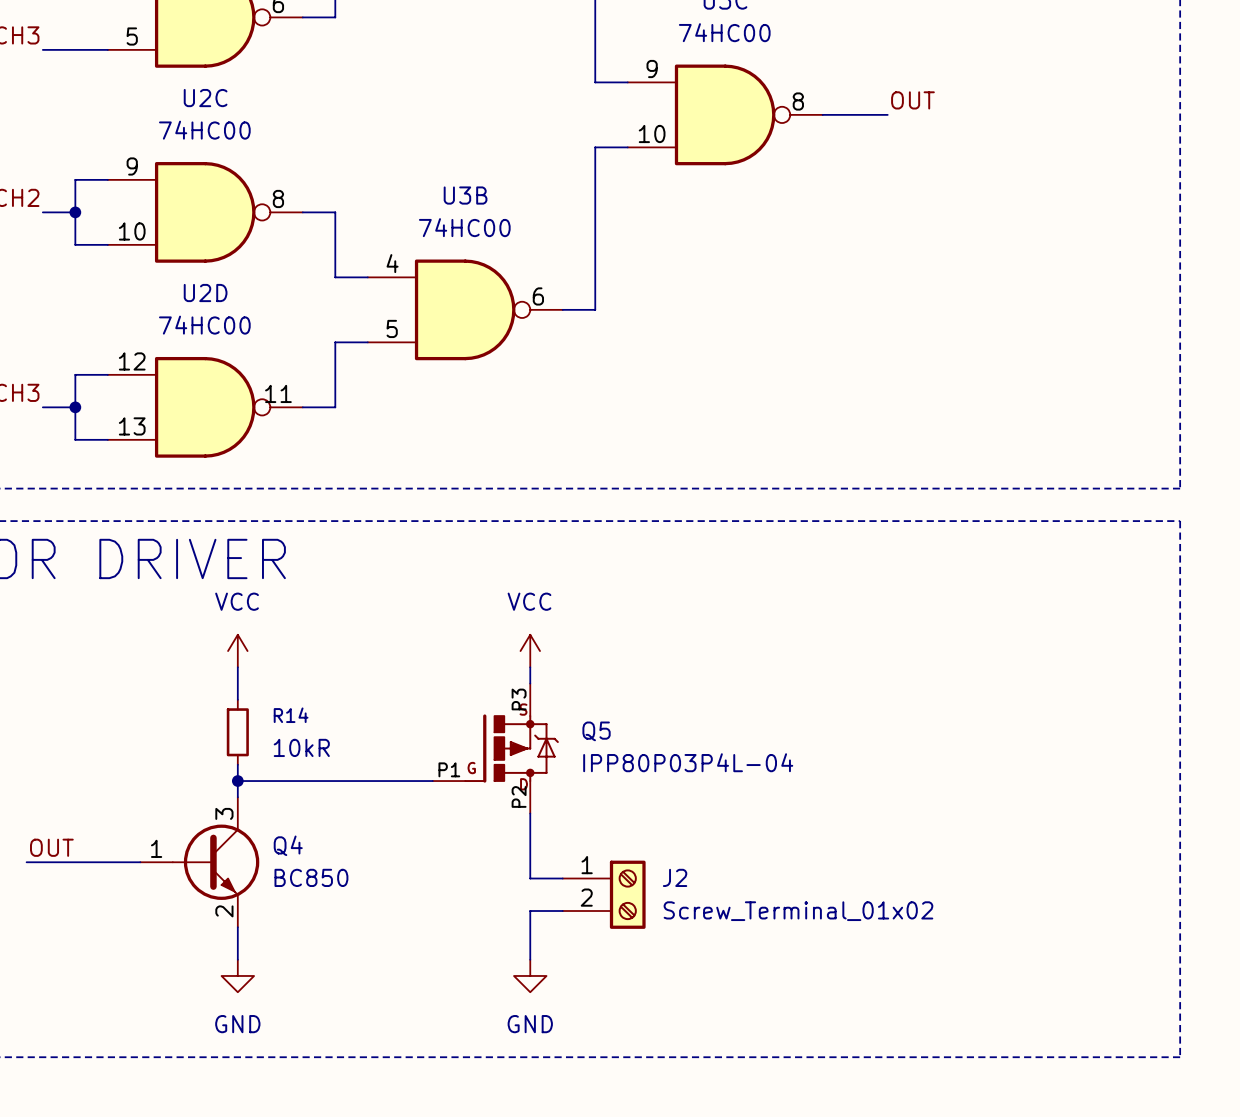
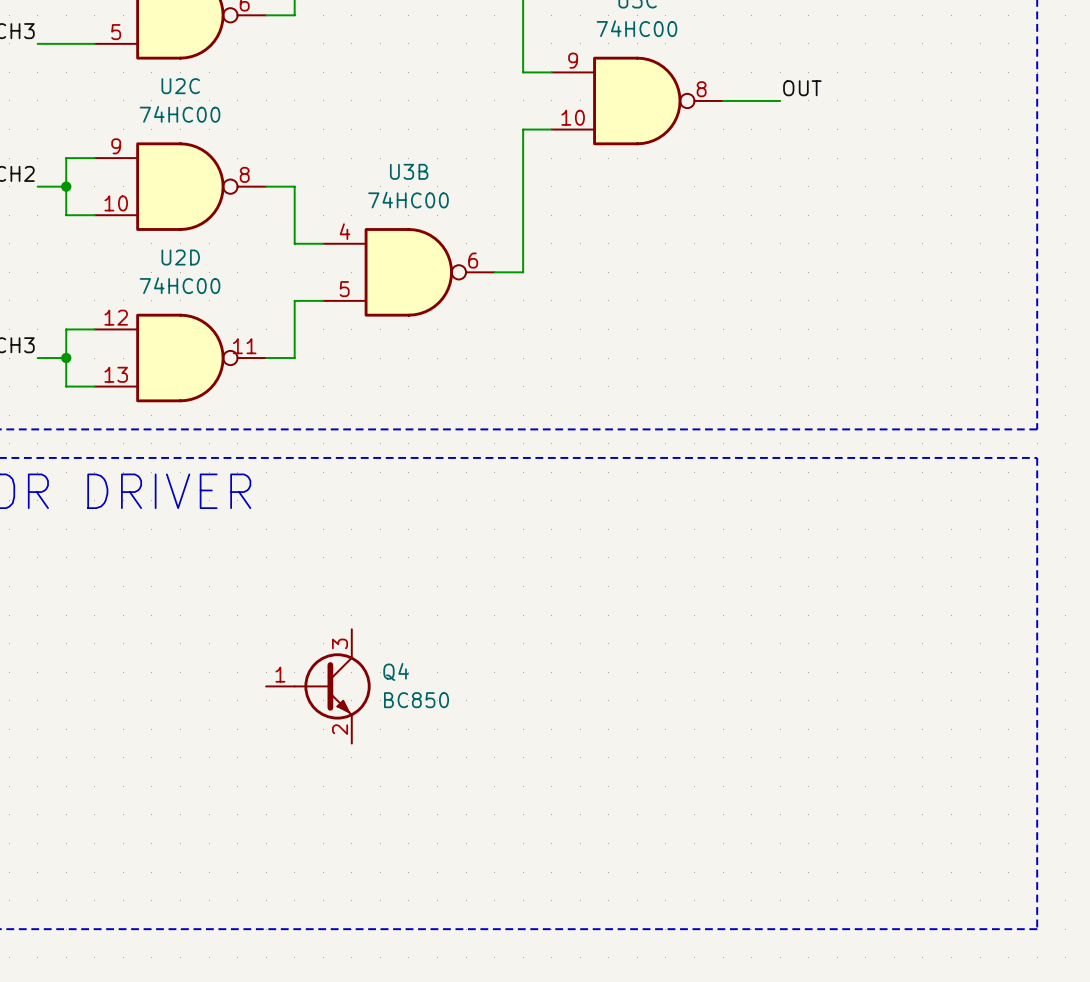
power symbol: VCC (237, 651) -> none
power symbol: VCC (530, 651) -> none
wire: (237, 667) (237, 699) -> none
wire: (530, 667) (530, 683) -> none
R14: 10kR (237, 732) -> none
Q5: IPP80P03P4L-04 (495, 748) -> none
wire: (237, 764) (237, 797) -> none
wire: (237, 781) (432, 781) -> none
junction: (237, 781) -> none
wire: (530, 813) (530, 878) (562, 878) -> none
label: OUT (51, 847) -> none
wire: (26, 862) (140, 862) -> none
Q4 position: (199, 862) -> (318, 686)
J2: Screw_Terminal_01x02 (604, 894) -> none
wire: (562, 911) (530, 911) (530, 959) -> none
wire: (237, 927) (237, 959) -> none
power symbol: GND (237, 975) -> none
power symbol: GND (530, 975) -> none

